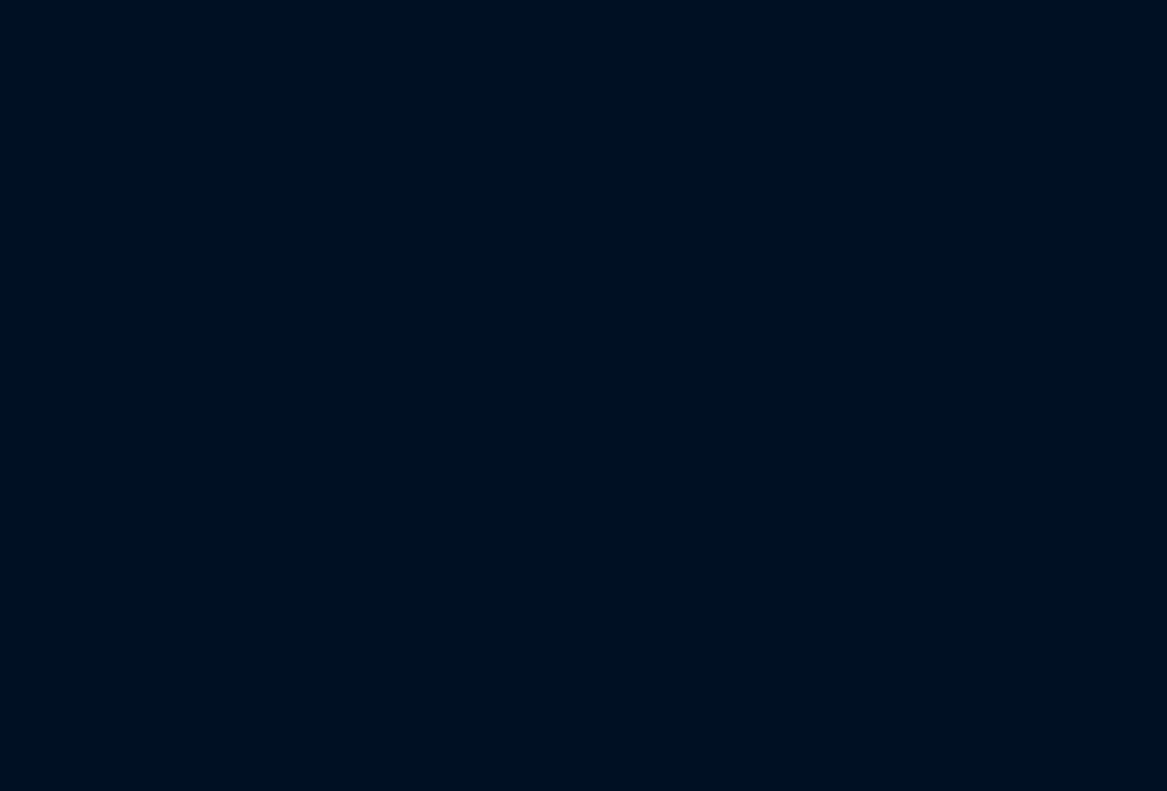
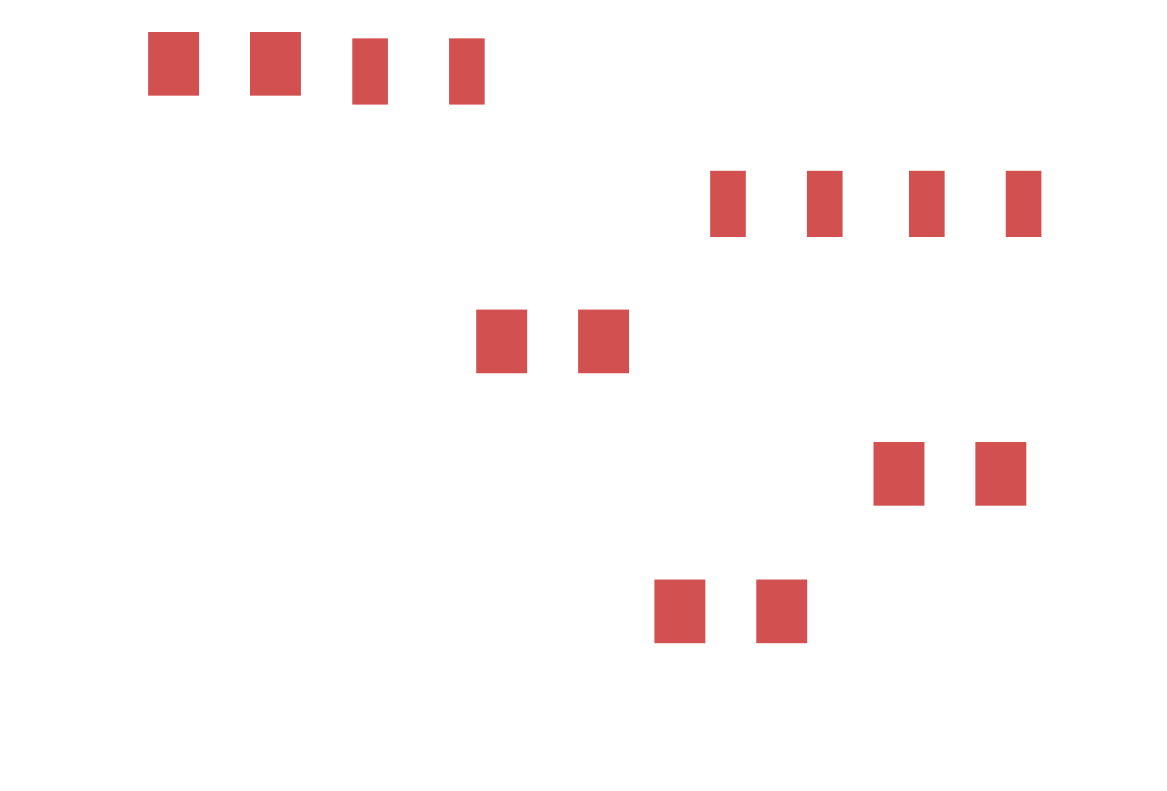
part: none -> (224, 63)
part: none -> (418, 71)
part: none -> (776, 203)
part: none -> (975, 203)
part: none -> (552, 341)
part: none -> (949, 473)
part: none -> (730, 611)

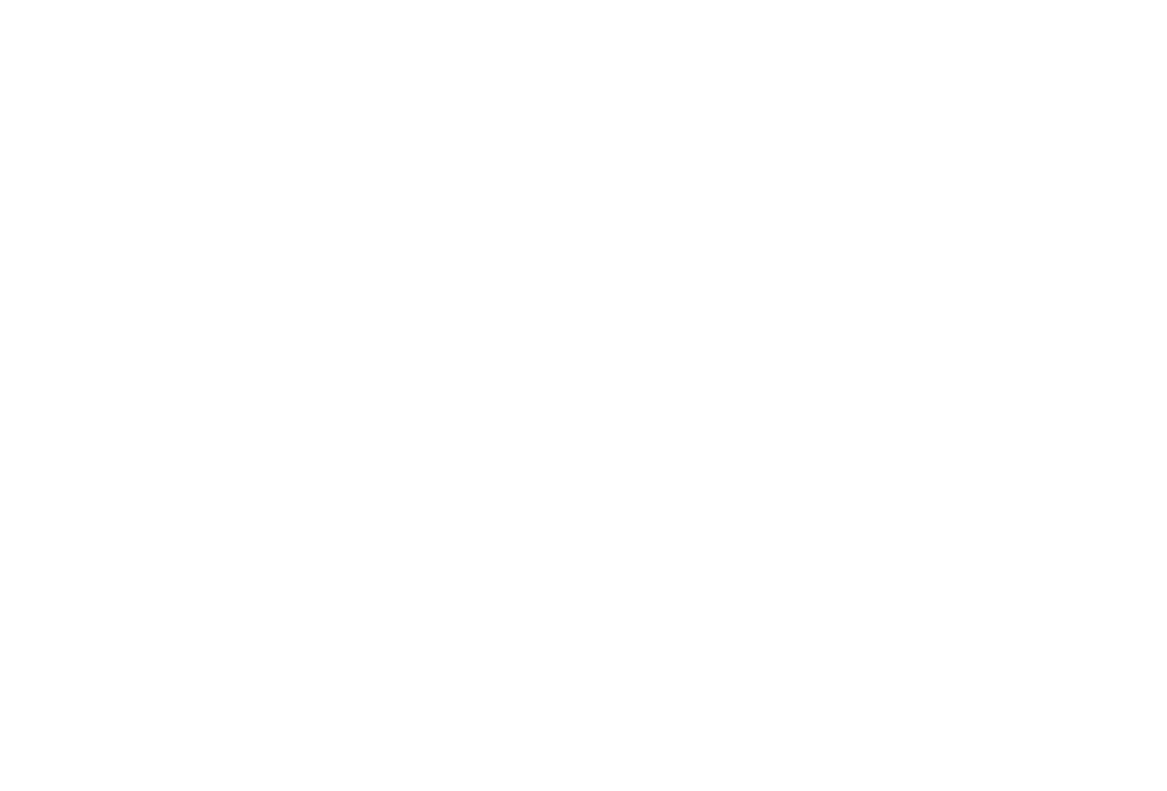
part: (224, 63) -> none
part: (418, 71) -> none
part: (776, 203) -> none
part: (975, 203) -> none
part: (552, 341) -> none
part: (949, 473) -> none
part: (730, 611) -> none

